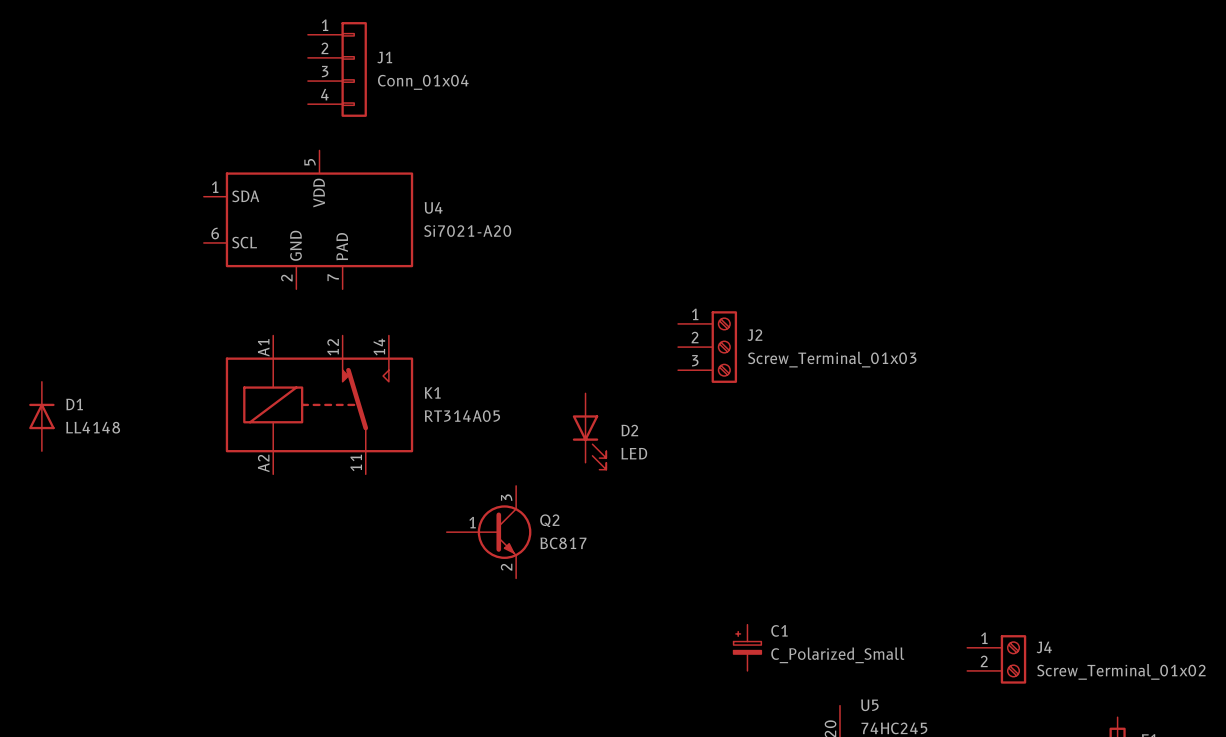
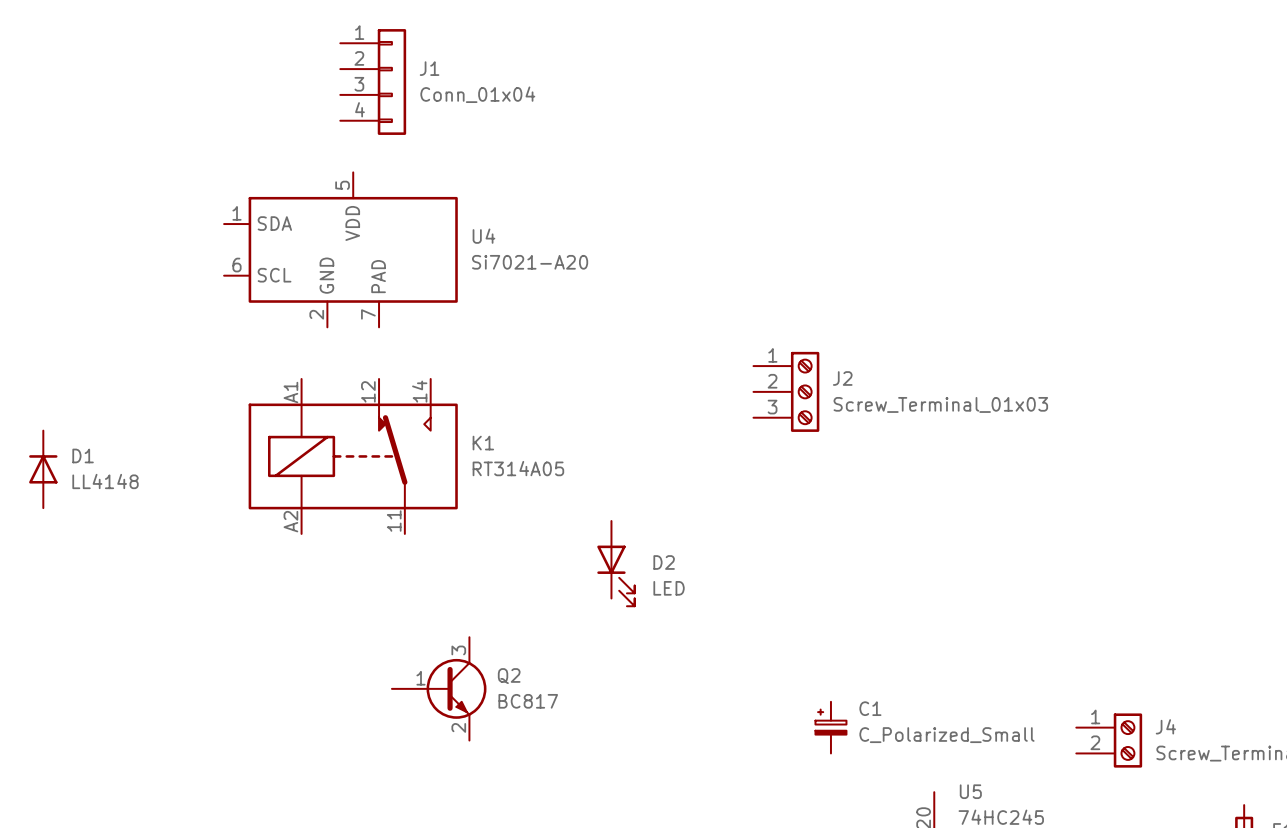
D2 position: (589, 431) -> (615, 563)
Q2 position: (489, 532) -> (439, 688)

